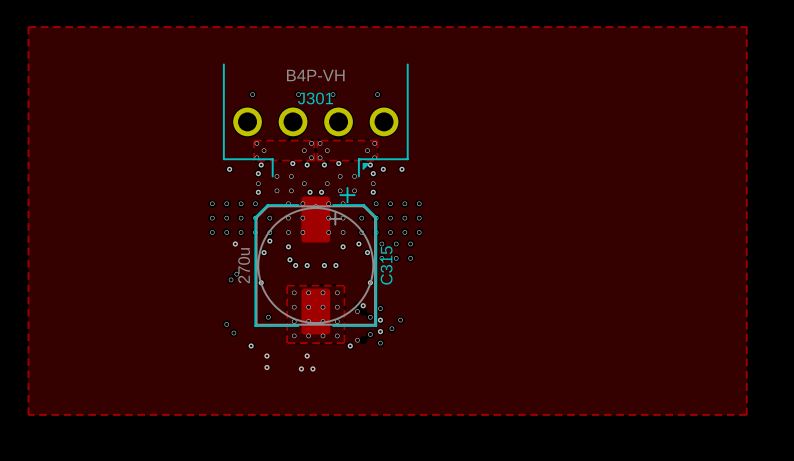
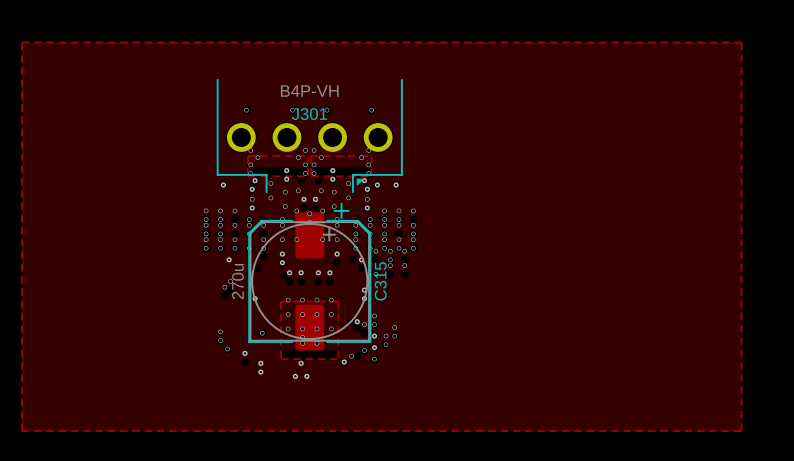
via: none -> (250, 150)
via: none -> (305, 150)
via: none -> (314, 150)
via: none -> (368, 150)
via: none -> (257, 157)
via: none -> (298, 157)
via: none -> (321, 157)
via: none -> (361, 157)
via: (256, 143) -> none
via: (311, 143) -> none
via: (320, 143) -> none
via: (374, 143) -> none
via: none -> (250, 164)
via: none -> (305, 164)
via: none -> (314, 164)
via: none -> (368, 164)
via: (264, 150) -> none
via: (304, 150) -> none
via: (327, 150) -> none
via: (367, 150) -> none
via: none -> (286, 170)
via: none -> (332, 170)
via: (307, 164) -> none
via: (324, 164) -> none
via: none -> (270, 183)
via: none -> (348, 183)
via: none -> (298, 190)
via: none -> (321, 190)
via: (277, 176) -> none
via: (354, 176) -> none
via: none -> (270, 197)
via: none -> (348, 197)
via: (304, 183) -> none
via: none -> (304, 199)
via: none -> (315, 199)
via: (327, 183) -> none
via: (277, 190) -> none
via: (354, 190) -> none
via: (310, 192) -> none
via: (321, 192) -> none
via: none -> (206, 210)
via: none -> (220, 210)
via: none -> (234, 210)
via: none -> (296, 210)
via: none -> (322, 210)
via: none -> (384, 210)
via: none -> (399, 210)
via: none -> (413, 210)
via: none -> (309, 213)
via: (241, 203) -> none
via: (302, 203) -> none
via: (328, 203) -> none
via: (419, 203) -> none
via: none -> (206, 225)
via: none -> (220, 225)
via: none -> (234, 225)
via: none -> (249, 225)
via: none -> (263, 225)
via: none -> (282, 225)
via: none -> (337, 225)
via: none -> (355, 225)
via: none -> (370, 225)
via: none -> (384, 225)
via: none -> (399, 225)
via: none -> (413, 225)
via: (241, 218) -> none
via: (269, 218) -> none
via: (288, 218) -> none
via: (302, 218) -> none
via: (328, 218) -> none
via: (343, 218) -> none
via: (404, 218) -> none
via: none -> (206, 239)
via: none -> (220, 239)
via: none -> (234, 239)
via: none -> (263, 239)
via: none -> (282, 239)
via: none -> (296, 239)
via: none -> (322, 239)
via: none -> (337, 239)
via: none -> (355, 239)
via: none -> (384, 239)
via: none -> (399, 239)
via: none -> (413, 239)
via: (288, 232) -> none
via: (302, 232) -> none
via: (328, 232) -> none
via: (343, 232) -> none
via: none -> (375, 251)
via: none -> (390, 251)
via: none -> (404, 251)
via: none -> (282, 254)
via: none -> (337, 254)
via: (269, 241) -> none
via: (358, 243) -> none
via: none -> (361, 259)
via: (381, 243) -> none
via: (410, 243) -> none
via: (343, 246) -> none
via: none -> (390, 265)
via: none -> (404, 265)
via: (264, 252) -> none
via: (367, 252) -> none
via: none -> (289, 272)
via: none -> (301, 272)
via: none -> (318, 272)
via: none -> (329, 272)
via: (396, 258) -> none
via: (410, 258) -> none
via: (289, 259) -> none
via: none -> (230, 281)
via: (295, 265) -> none
via: (307, 265) -> none
via: (324, 265) -> none
via: (335, 265) -> none
via: none -> (224, 287)
via: (236, 274) -> none
via: none -> (364, 290)
via: (231, 279) -> none
via: none -> (288, 300)
via: none -> (302, 300)
via: none -> (316, 300)
via: none -> (331, 300)
via: (294, 292) -> none
via: (308, 292) -> none
via: (322, 292) -> none
via: (337, 292) -> none
via: none -> (288, 314)
via: none -> (302, 314)
via: none -> (316, 314)
via: none -> (331, 314)
via: none -> (374, 315)
via: (294, 307) -> none
via: (308, 307) -> none
via: (322, 307) -> none
via: (337, 307) -> none
via: none -> (364, 324)
via: (357, 311) -> none
via: none -> (394, 327)
via: none -> (288, 328)
via: none -> (302, 328)
via: none -> (316, 328)
via: none -> (331, 328)
via: none -> (220, 331)
via: (370, 317) -> none
via: none -> (386, 336)
via: (294, 321) -> none
via: (322, 321) -> none
via: (337, 321) -> none
via: none -> (302, 343)
via: none -> (316, 343)
via: (294, 335) -> none
via: (308, 335) -> none
via: (322, 335) -> none
via: (337, 335) -> none
via: none -> (245, 353)
via: (251, 345) -> none
via: none -> (260, 363)
via: none -> (301, 363)
via: (307, 356) -> none
via: none -> (295, 376)
via: none -> (306, 376)
via: (266, 367) -> none
via: (301, 368) -> none
via: (312, 368) -> none

